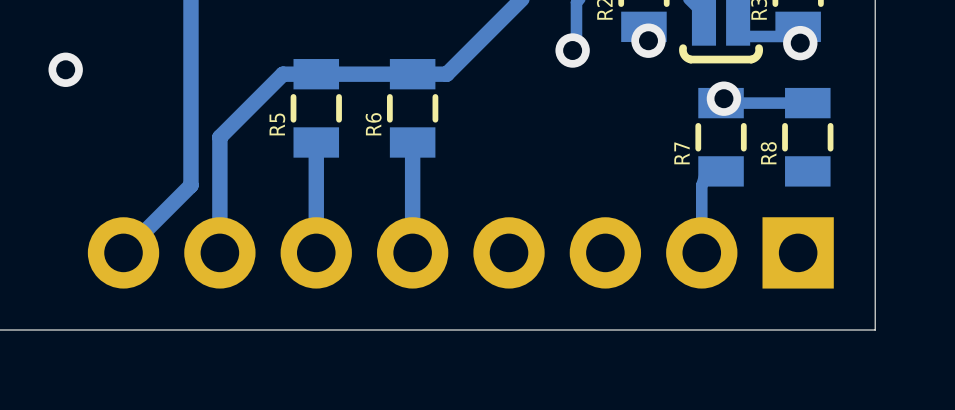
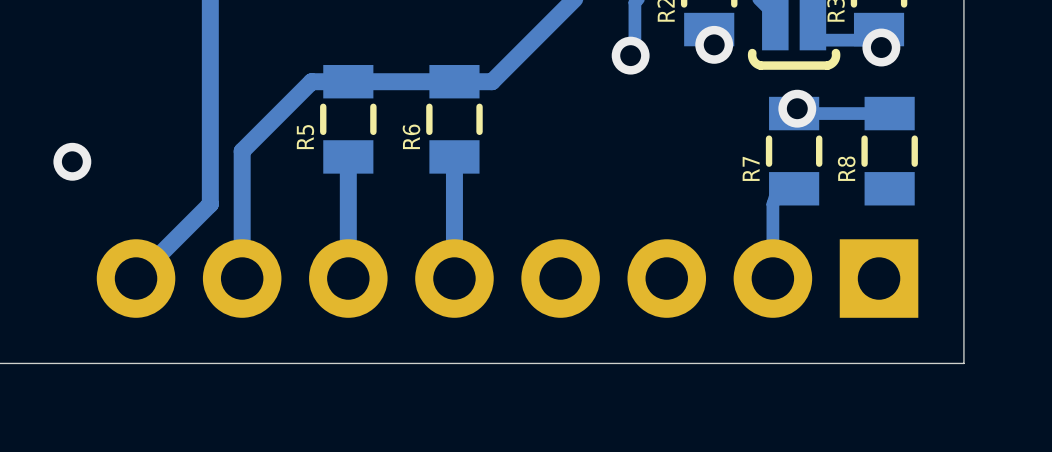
via position: (65, 69) -> (72, 161)

